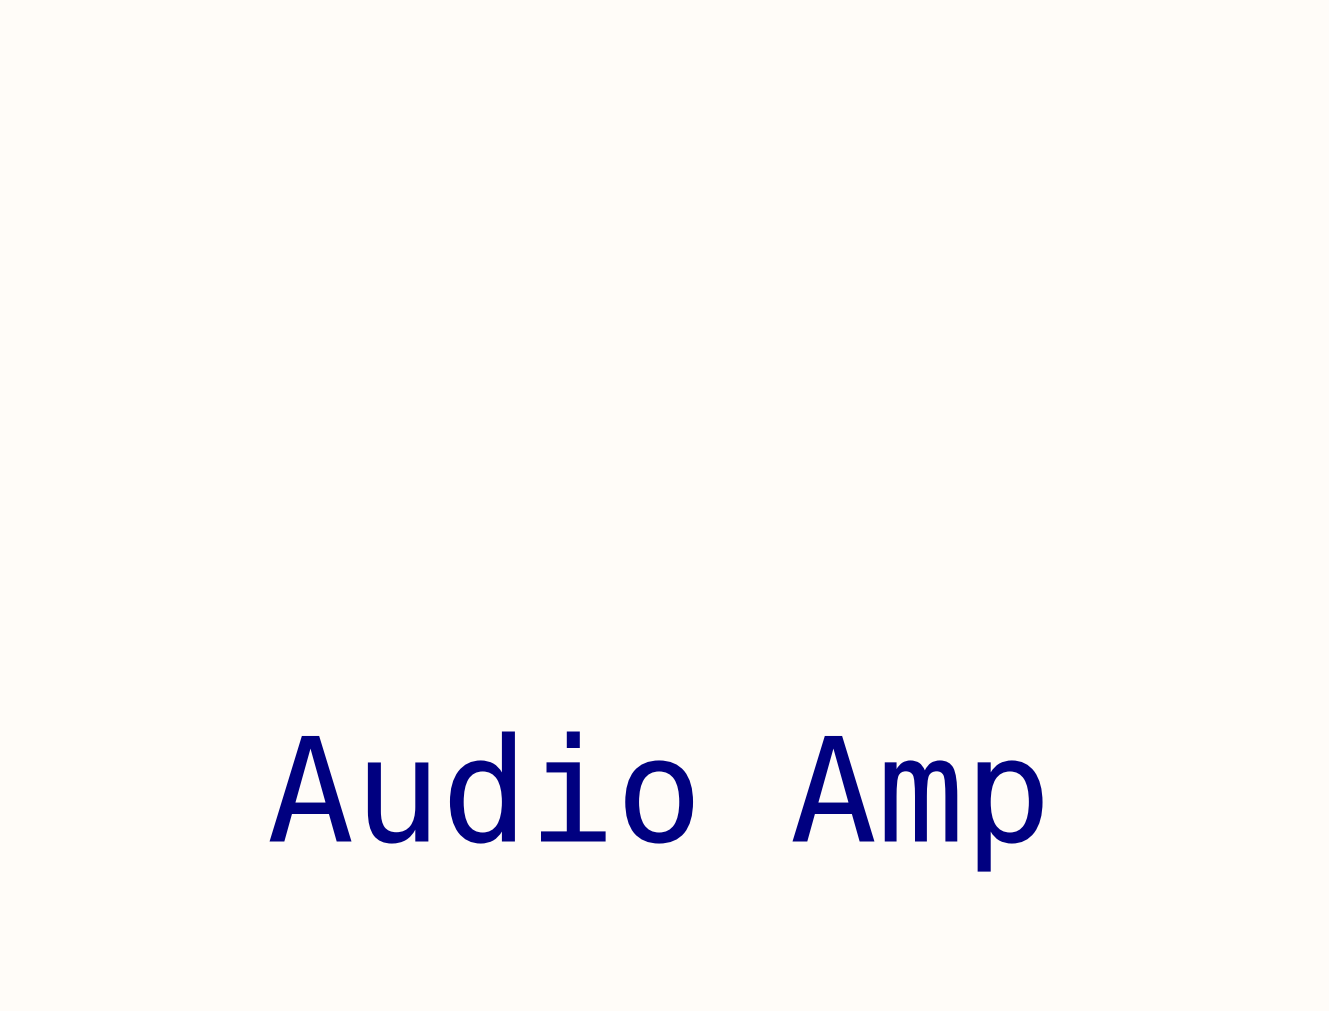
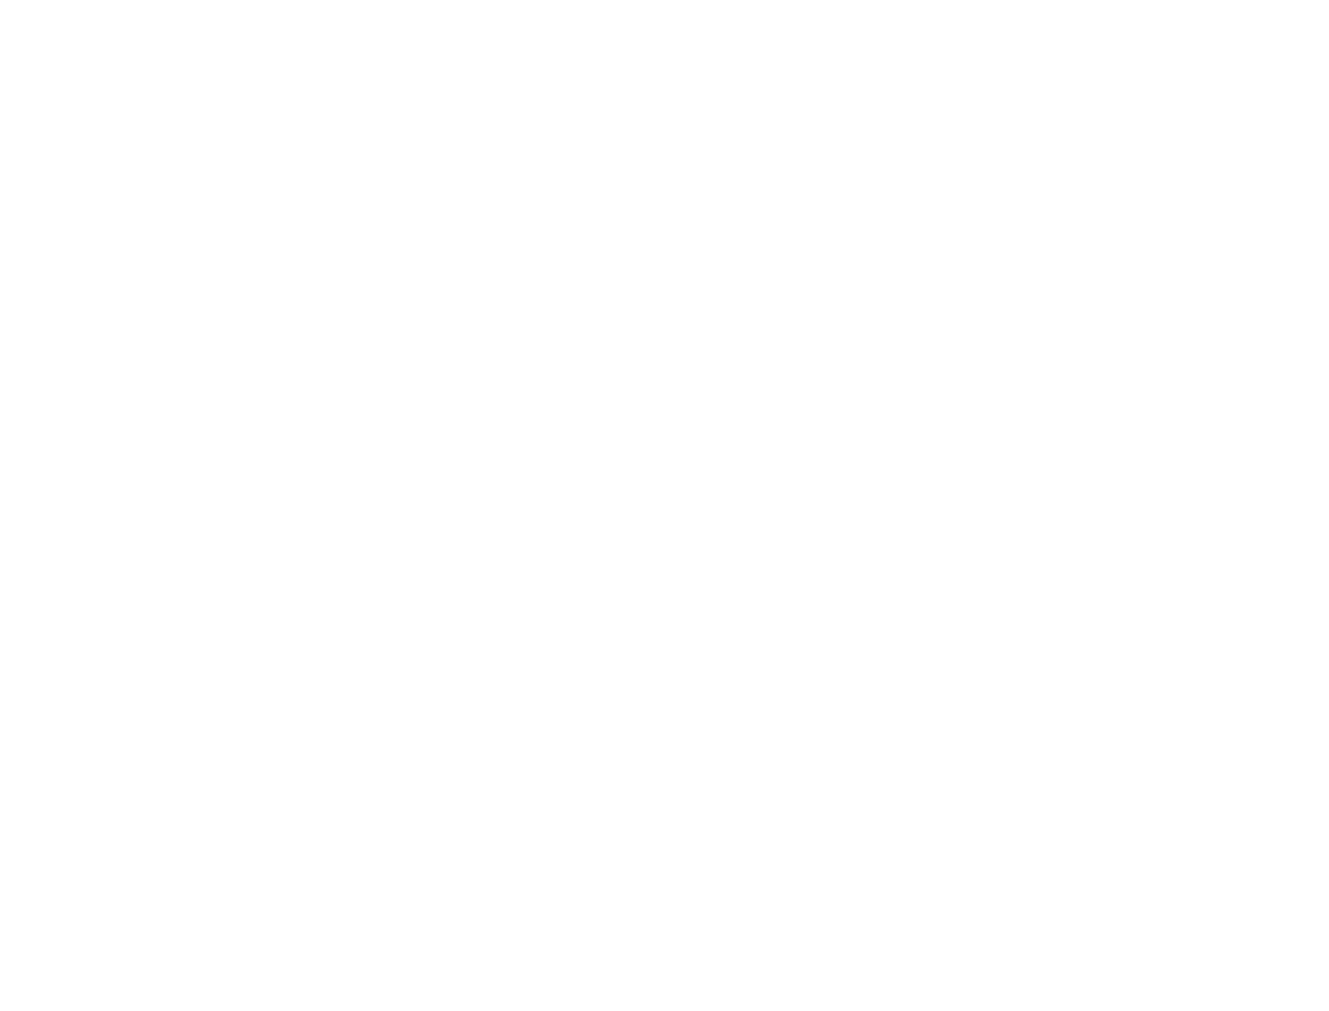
text: Audio Amp (656, 801) -> none

